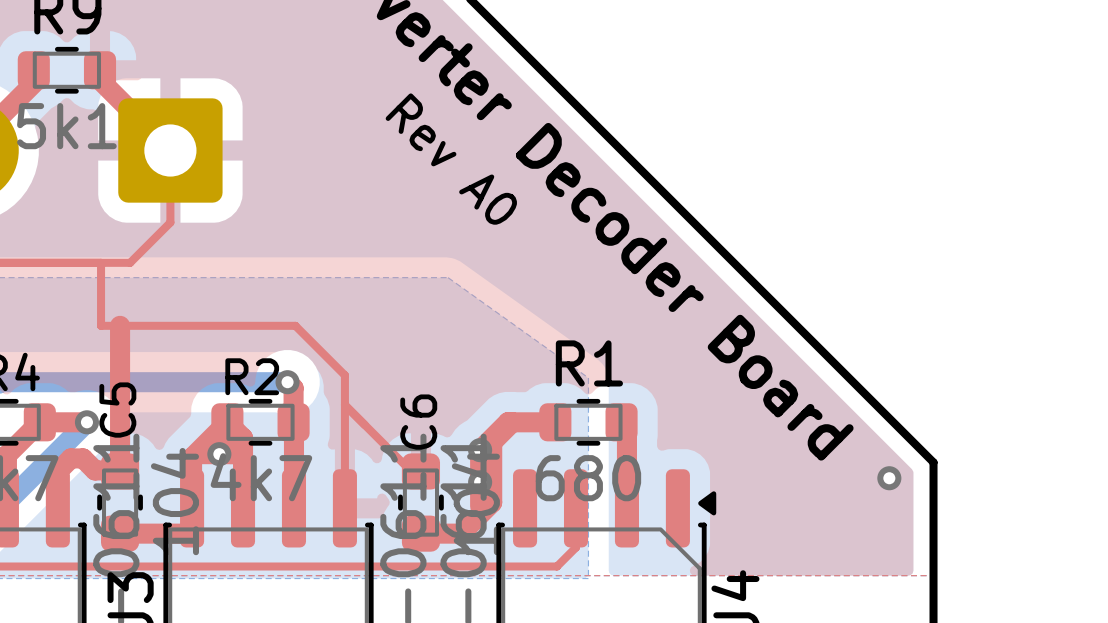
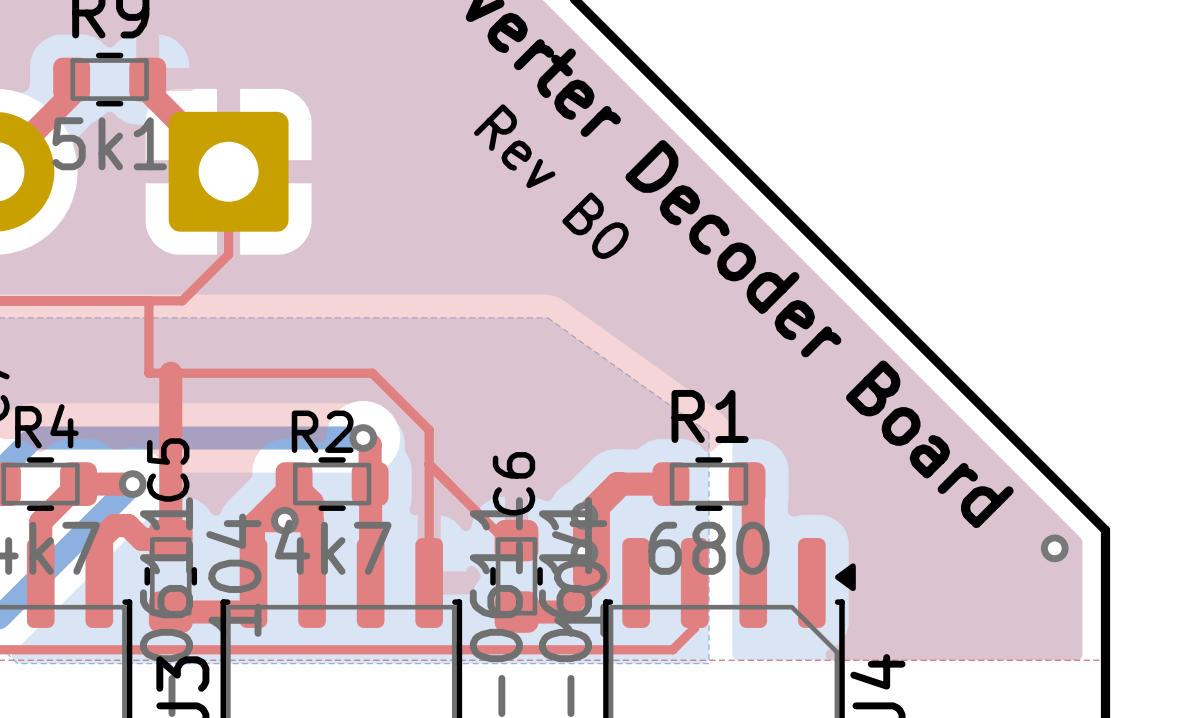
text: Rev A0 (451, 159) -> Rev B0 (551, 181)

